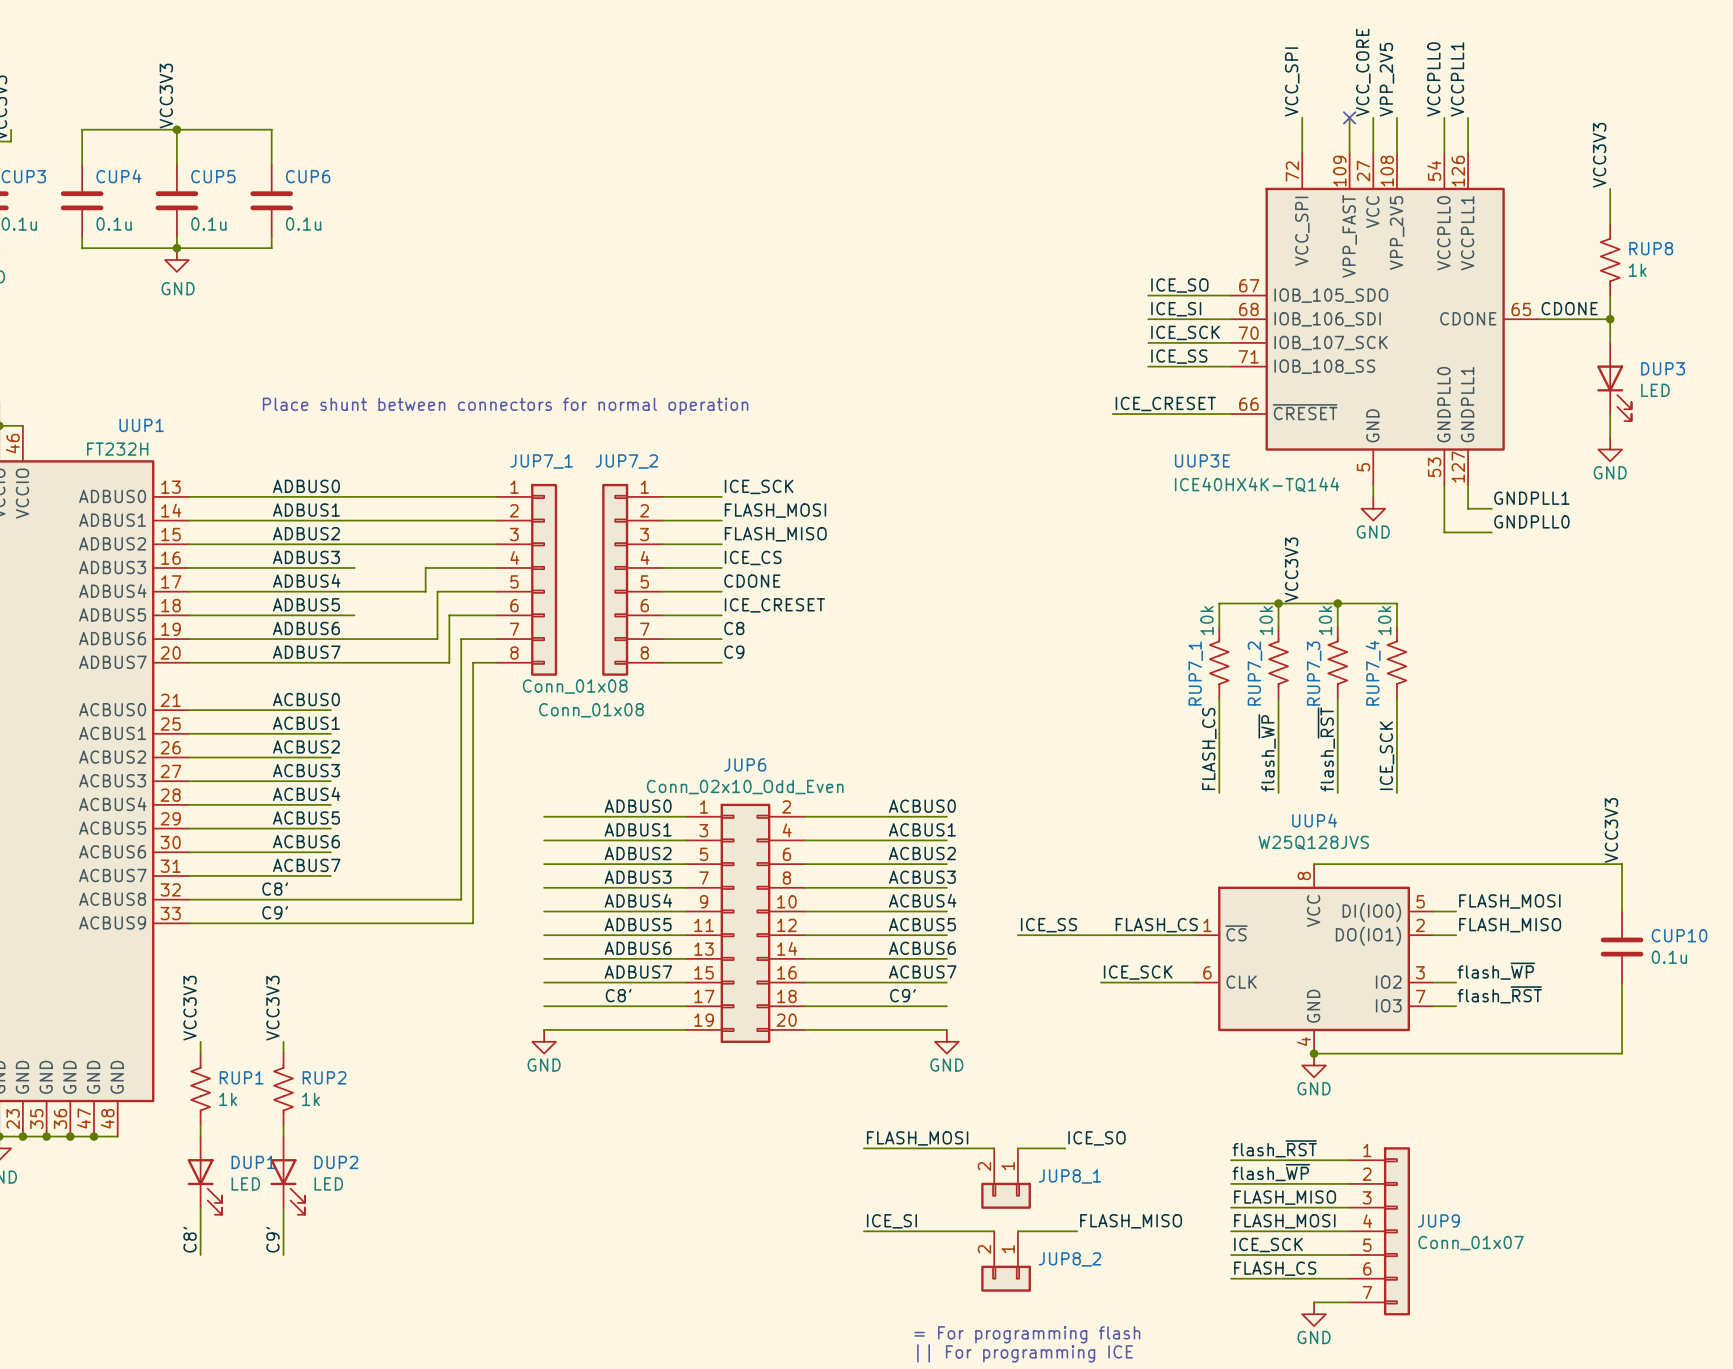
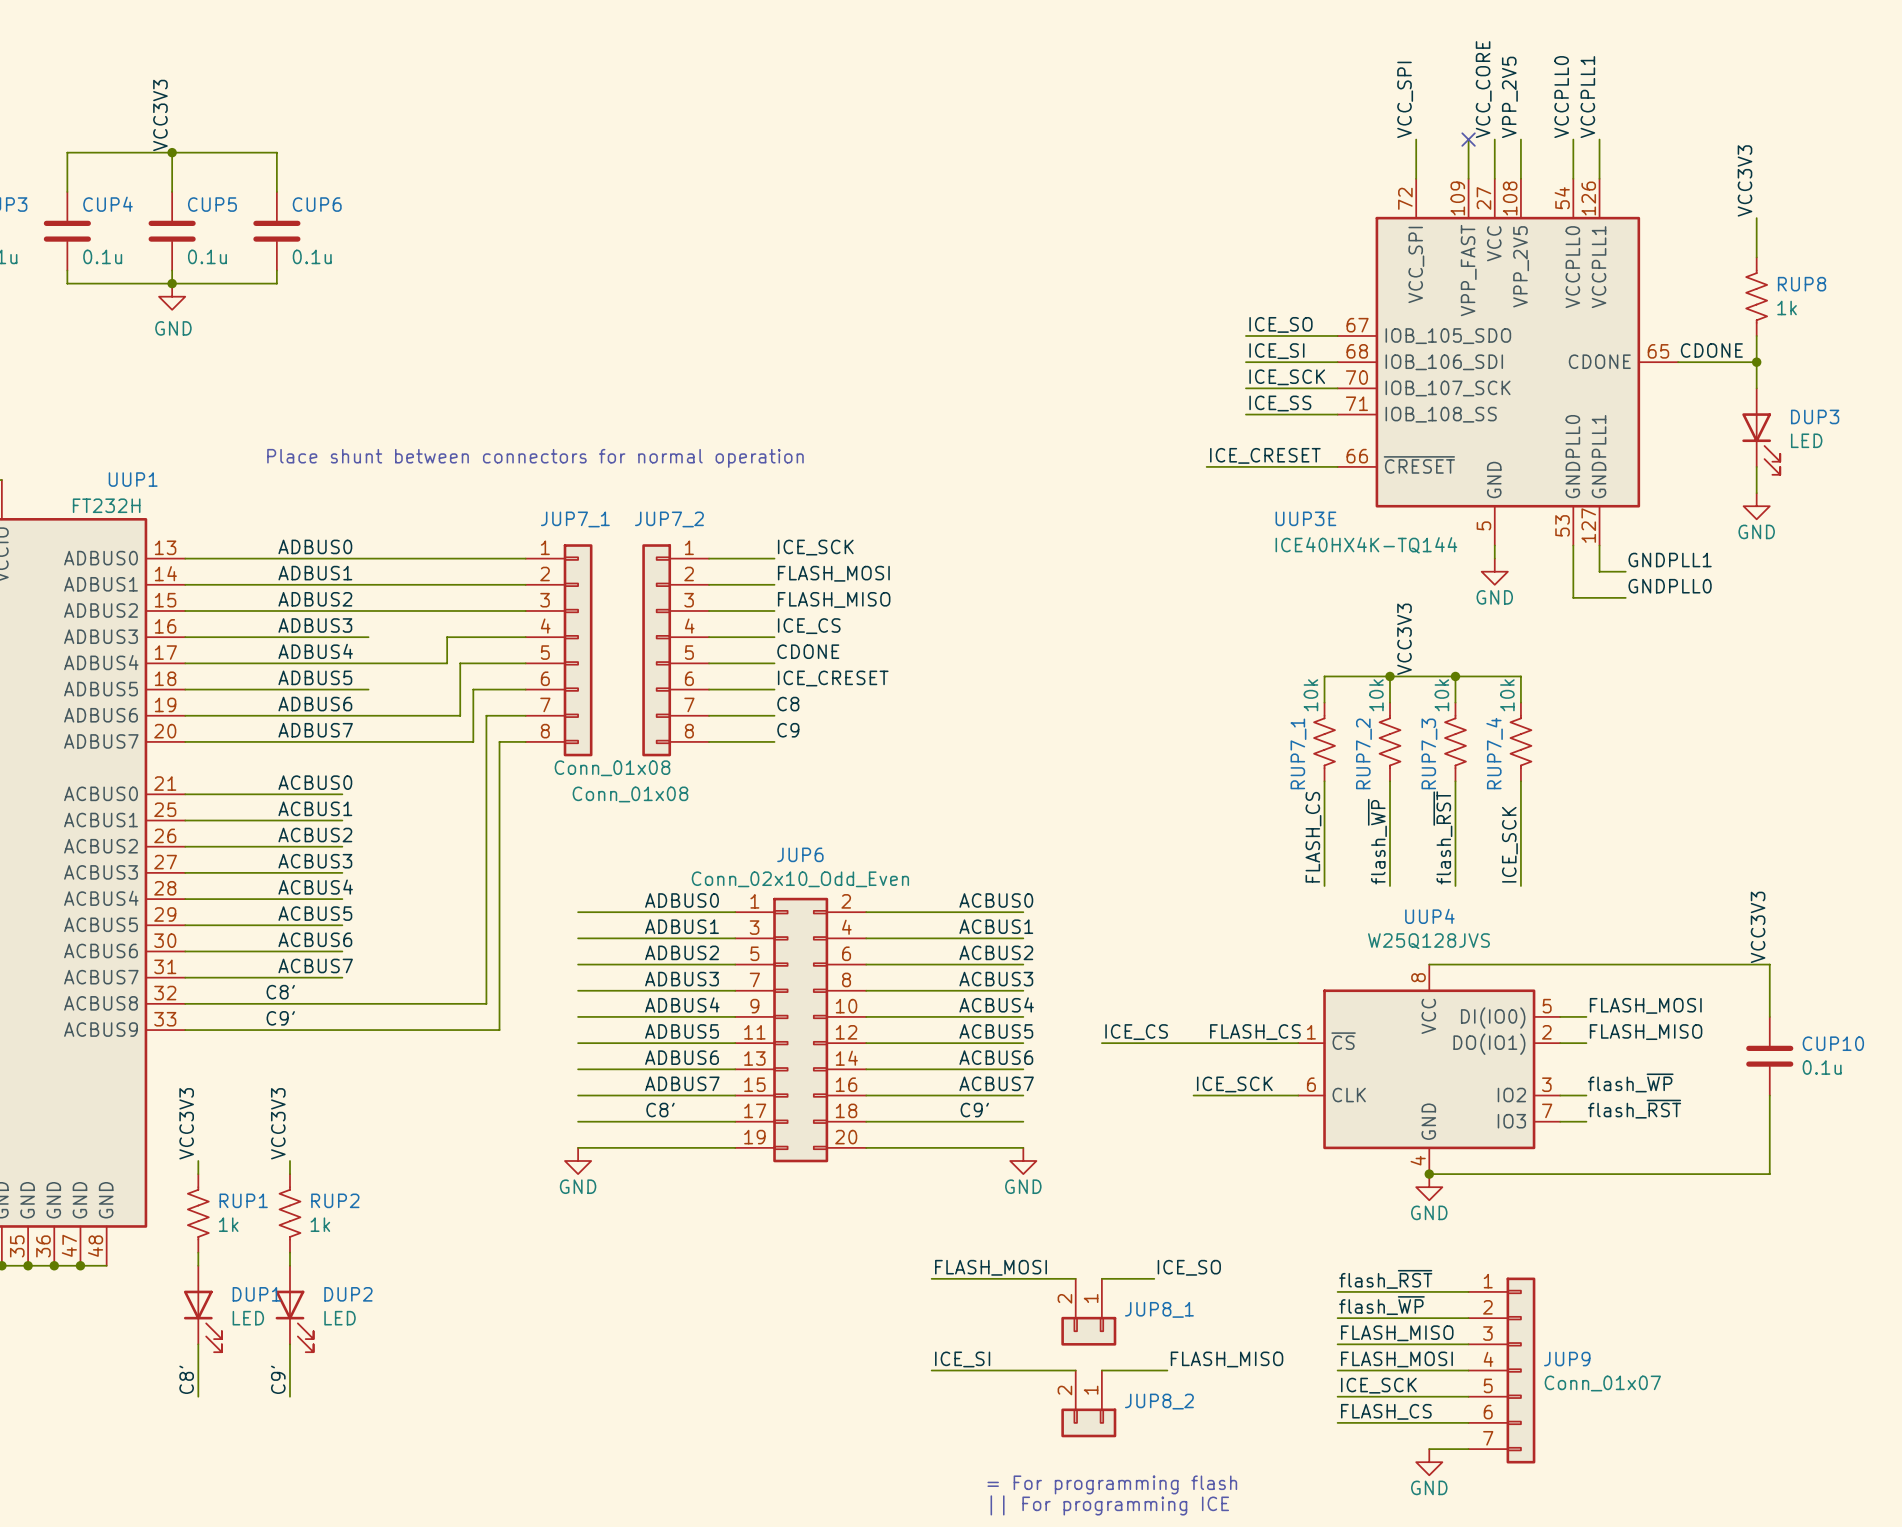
label: ICE_SS (1049, 925) -> ICE_CS (1136, 1032)

